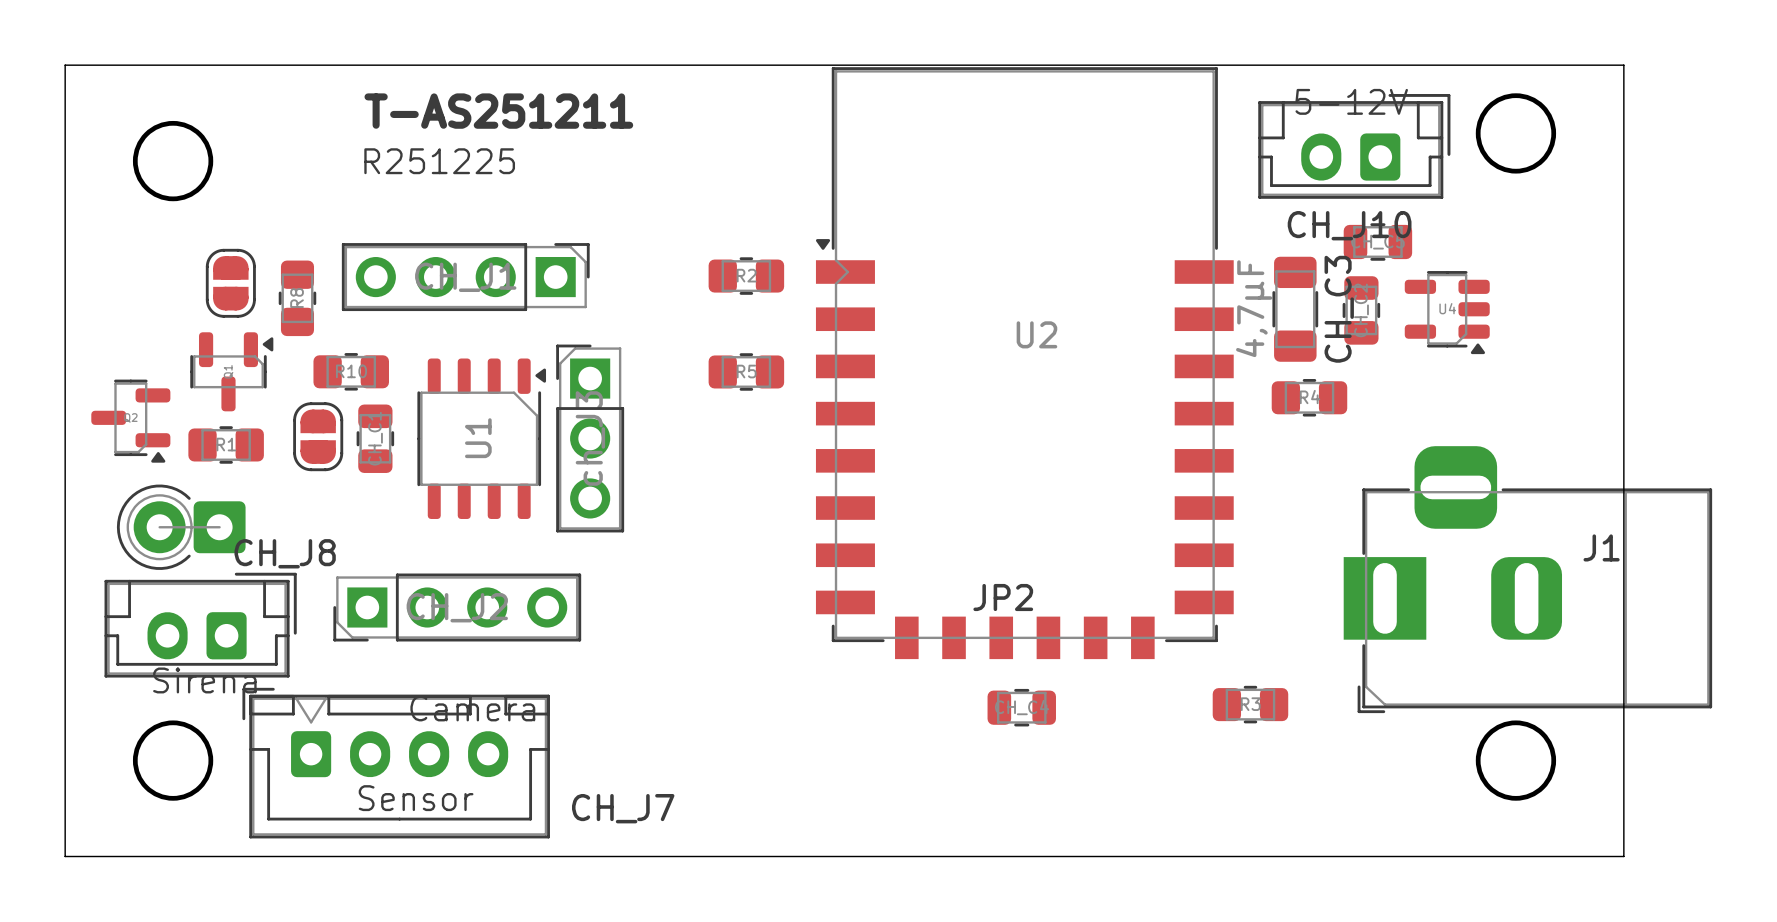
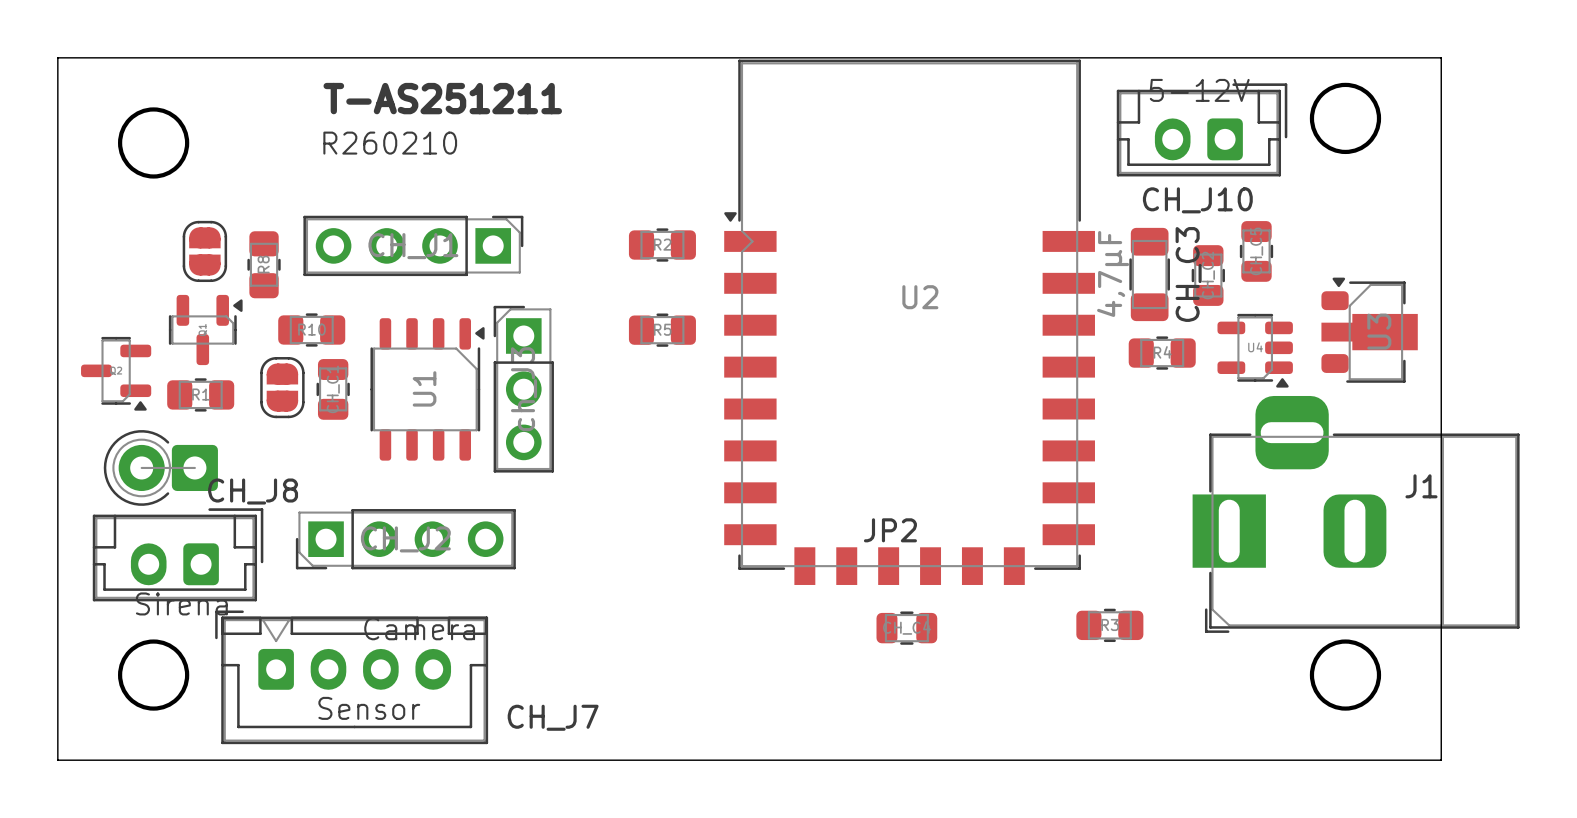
text: R251225 (439, 161) -> R260210 (390, 143)
part rotation: 0° (1377, 241) -> 90° clockwise (1256, 251)
part position: (1377, 241) -> (1256, 251)
U4 position: (1447, 312) -> (1255, 350)
part: none -> (1369, 330)

